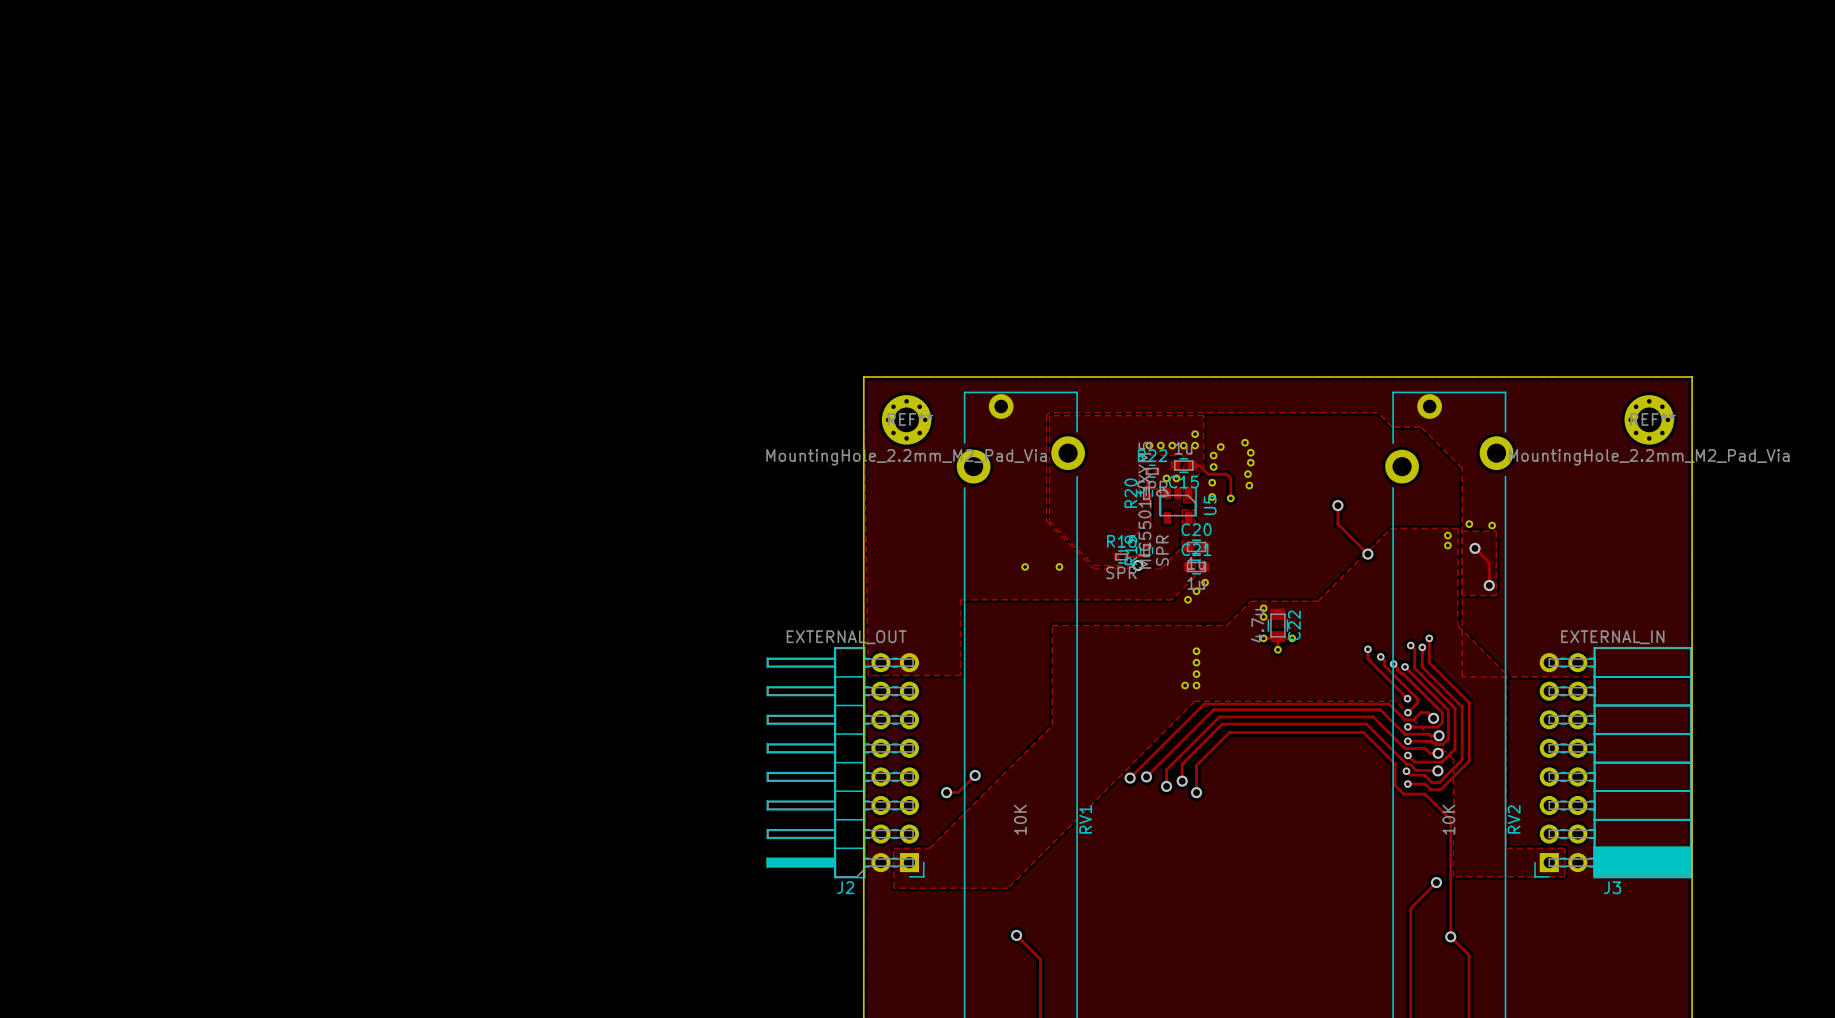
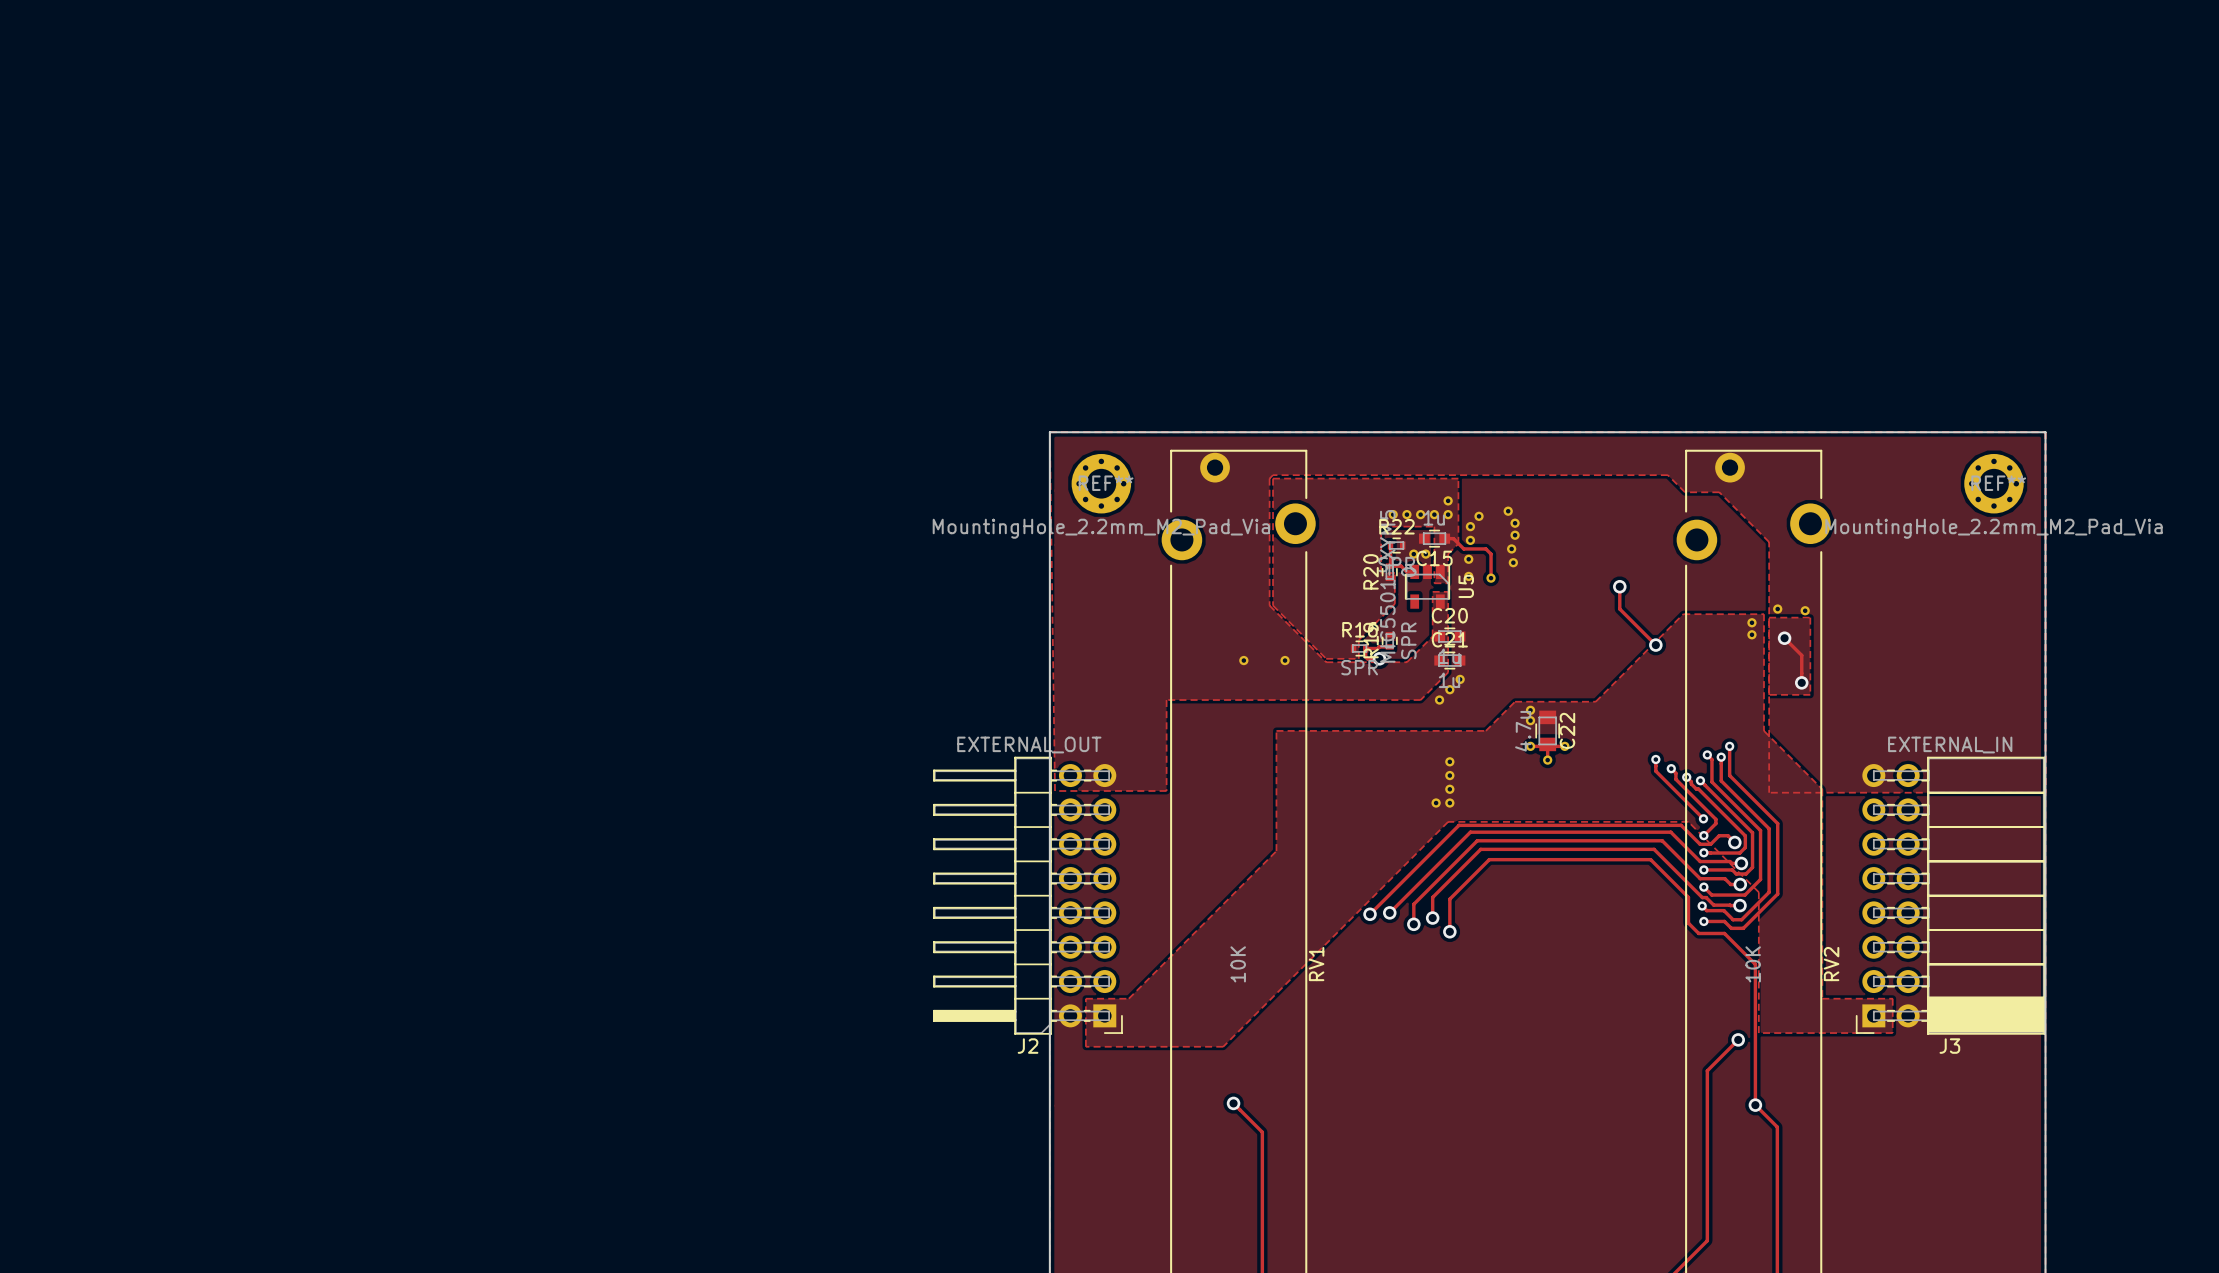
track: (975, 775) (958, 792) (946, 792) -> none
via: (975, 775) -> none
via: (946, 792) -> none

